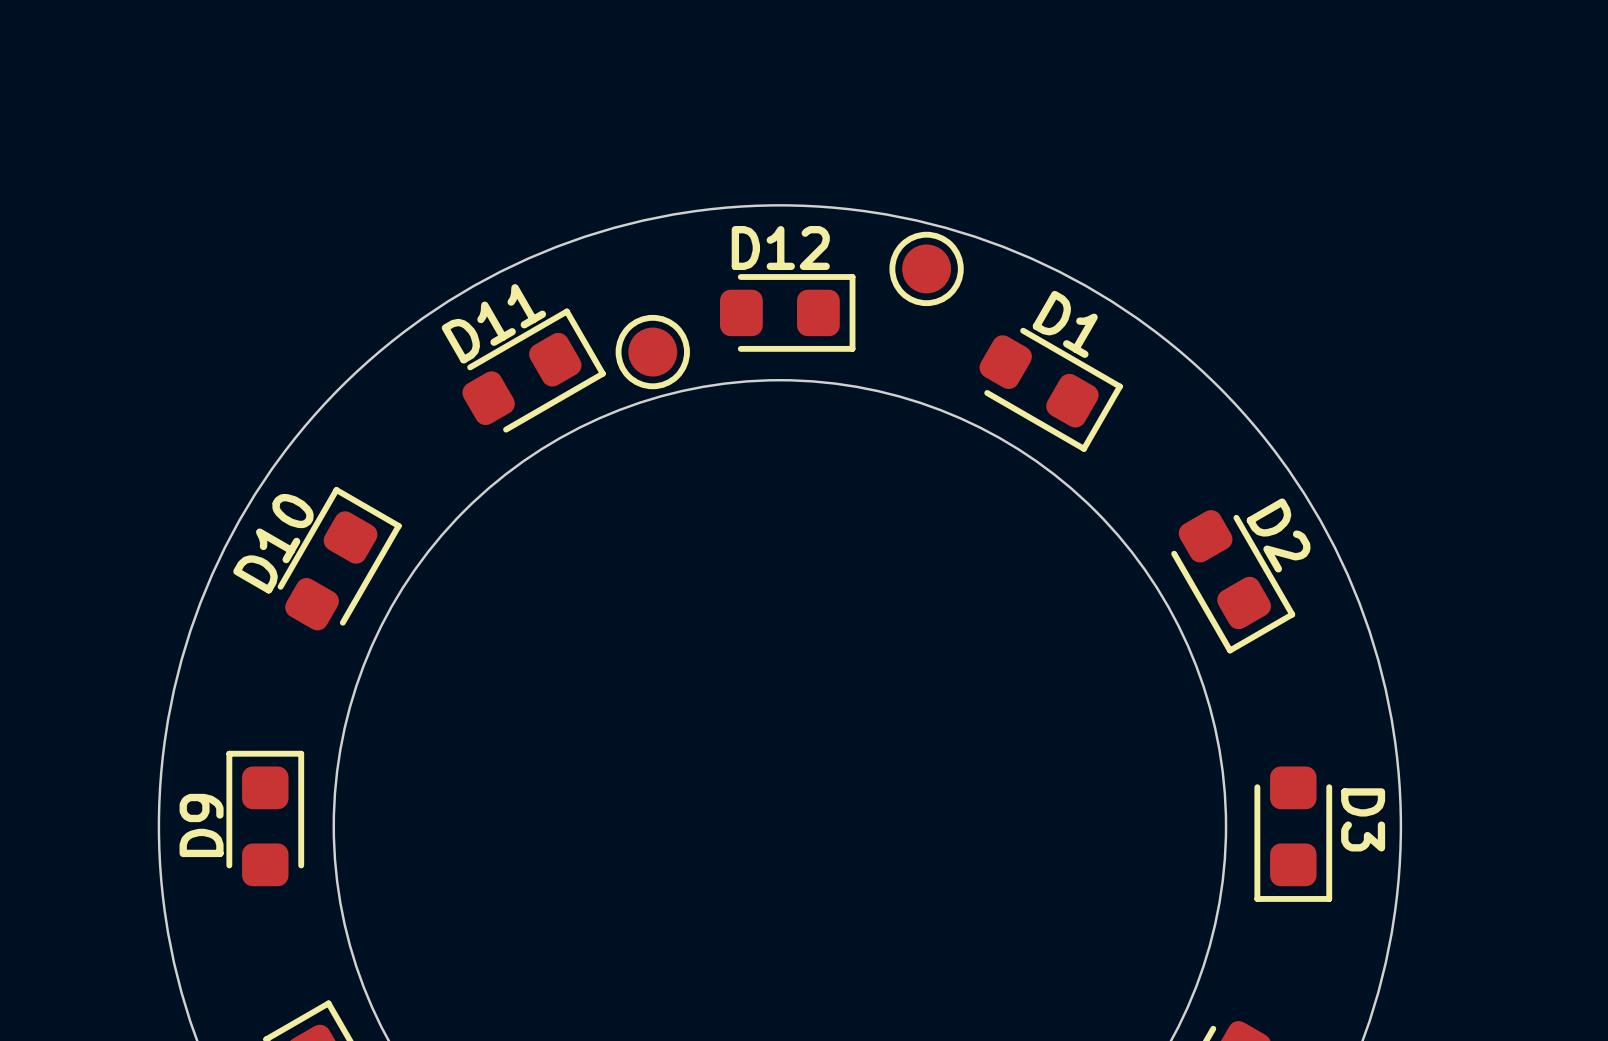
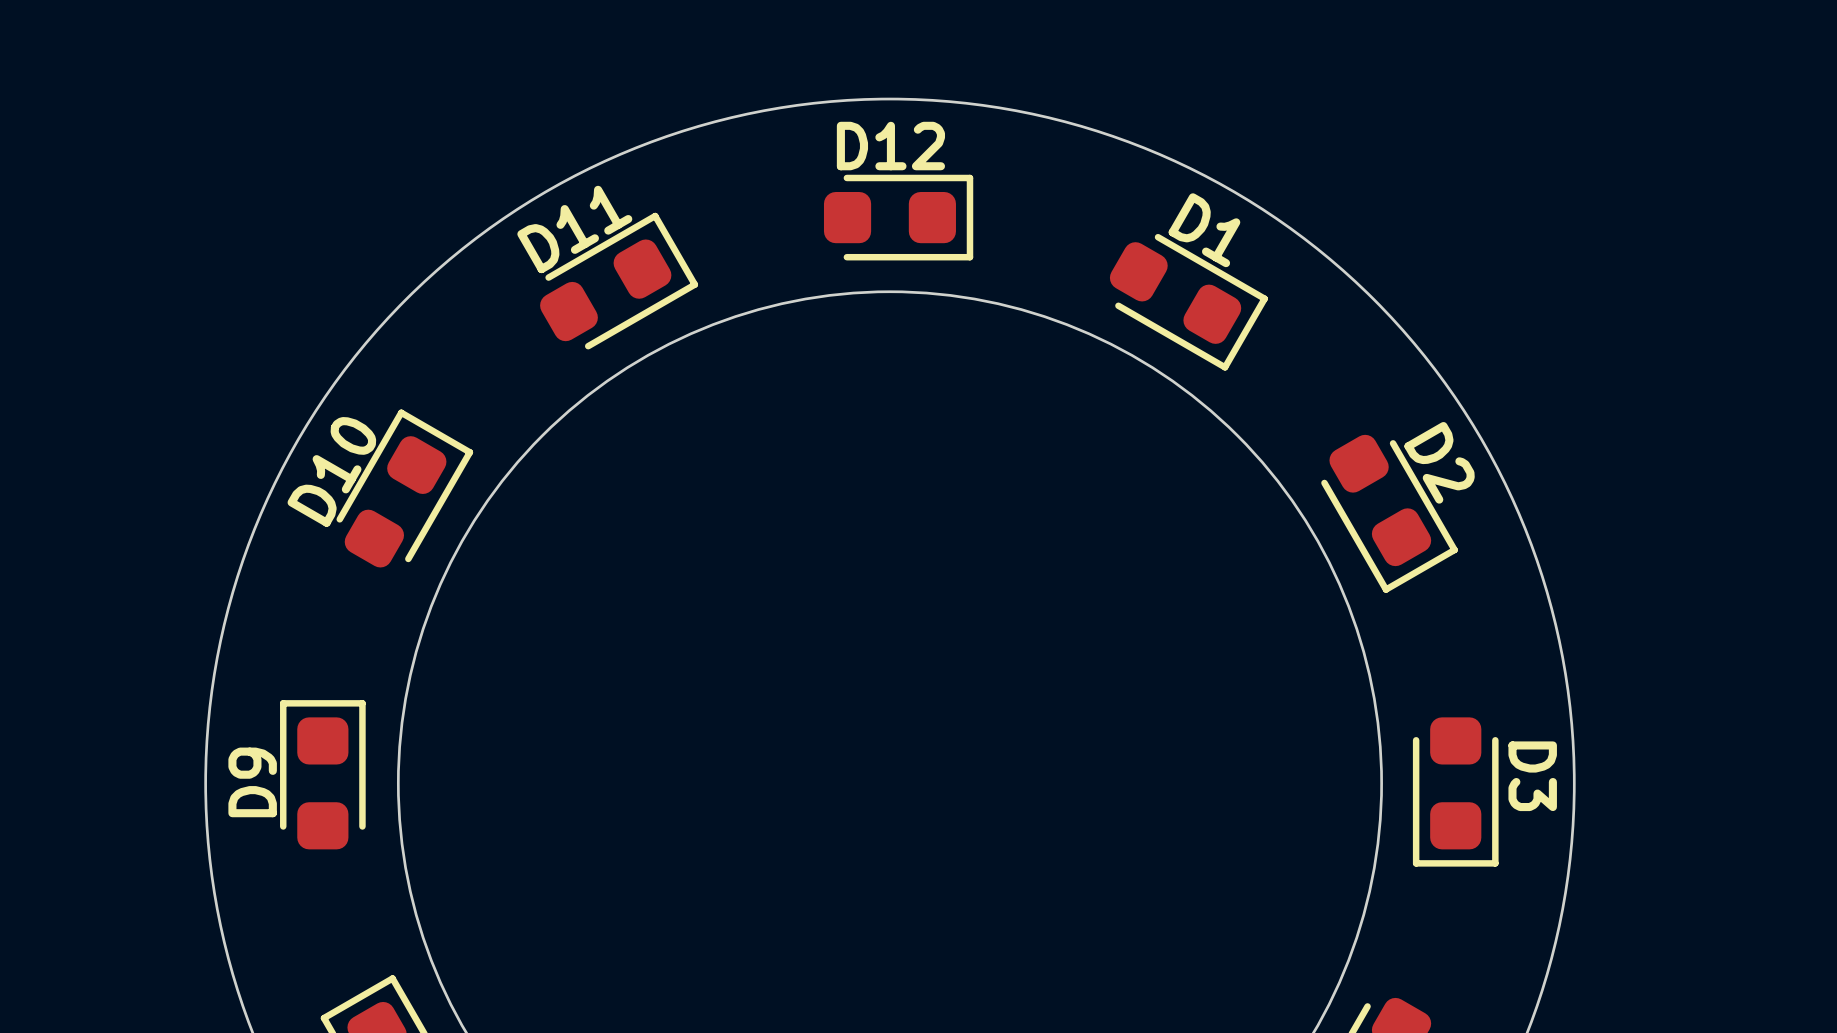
part: (926, 268) -> none
part: (652, 352) -> none

